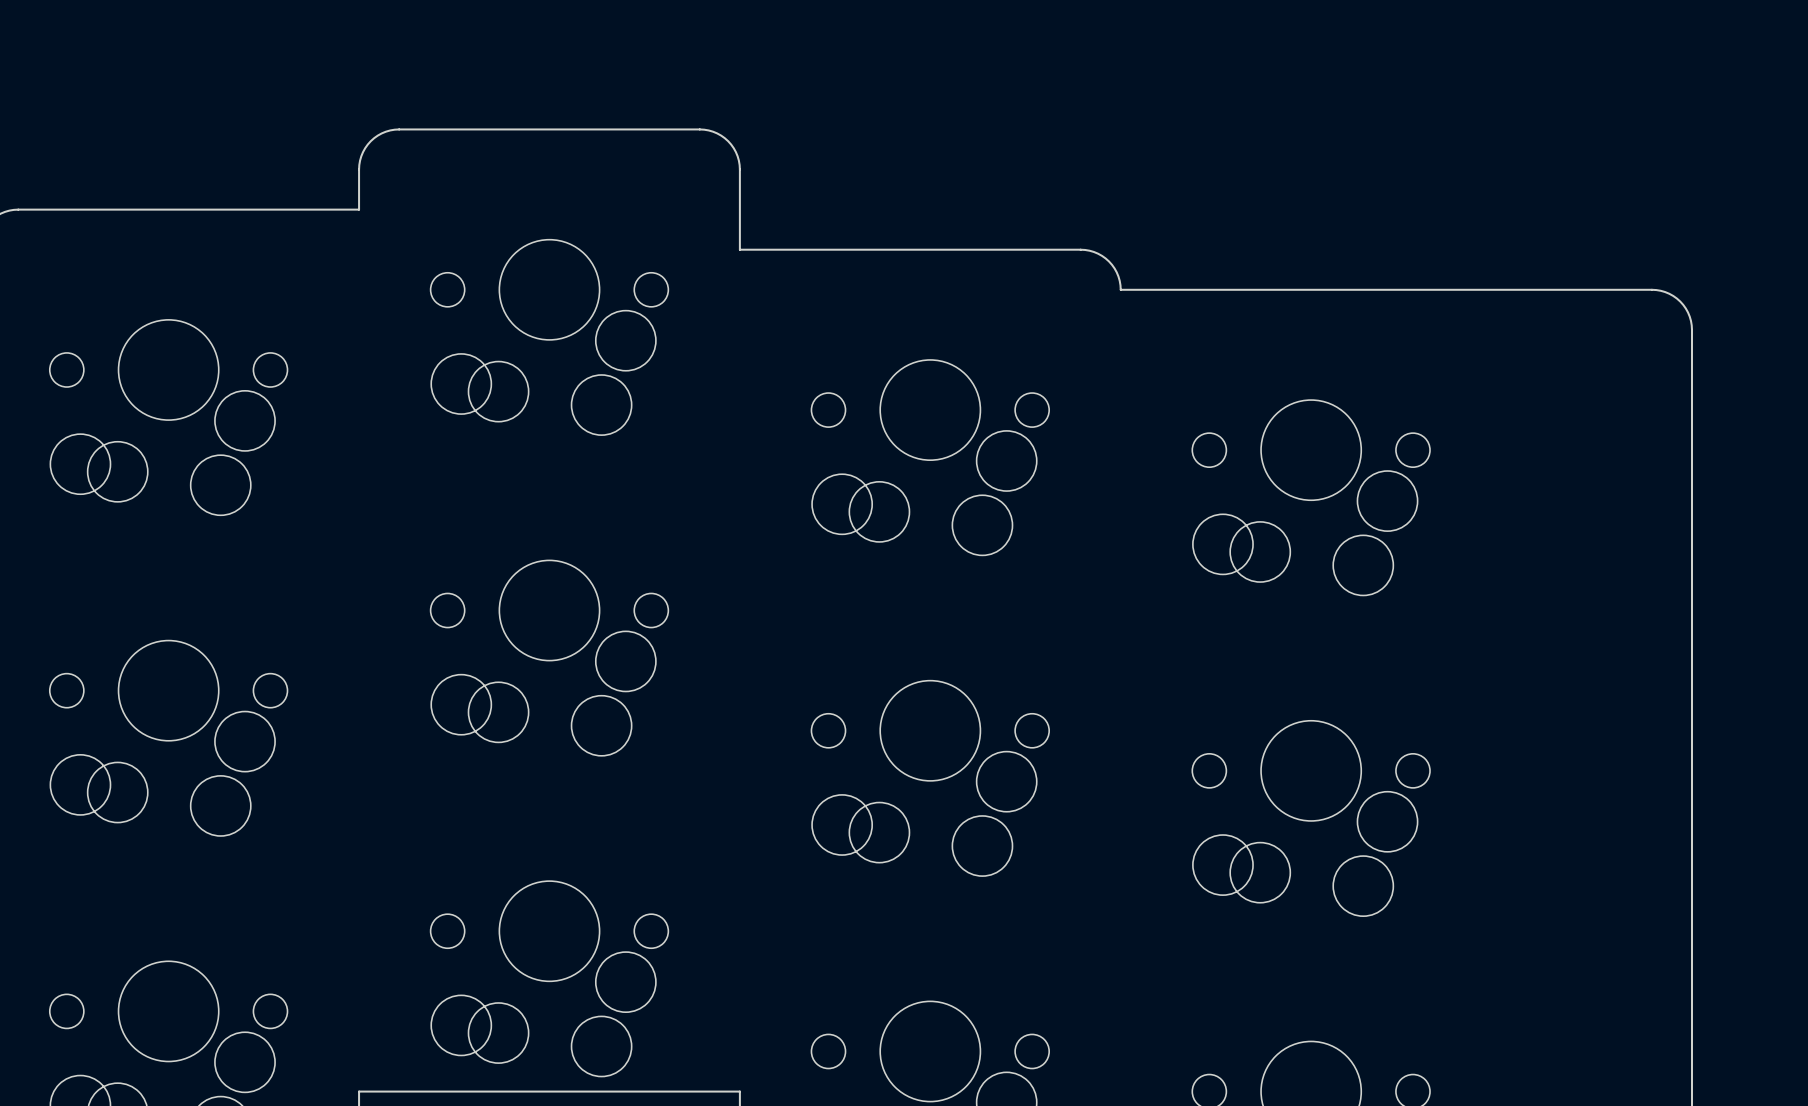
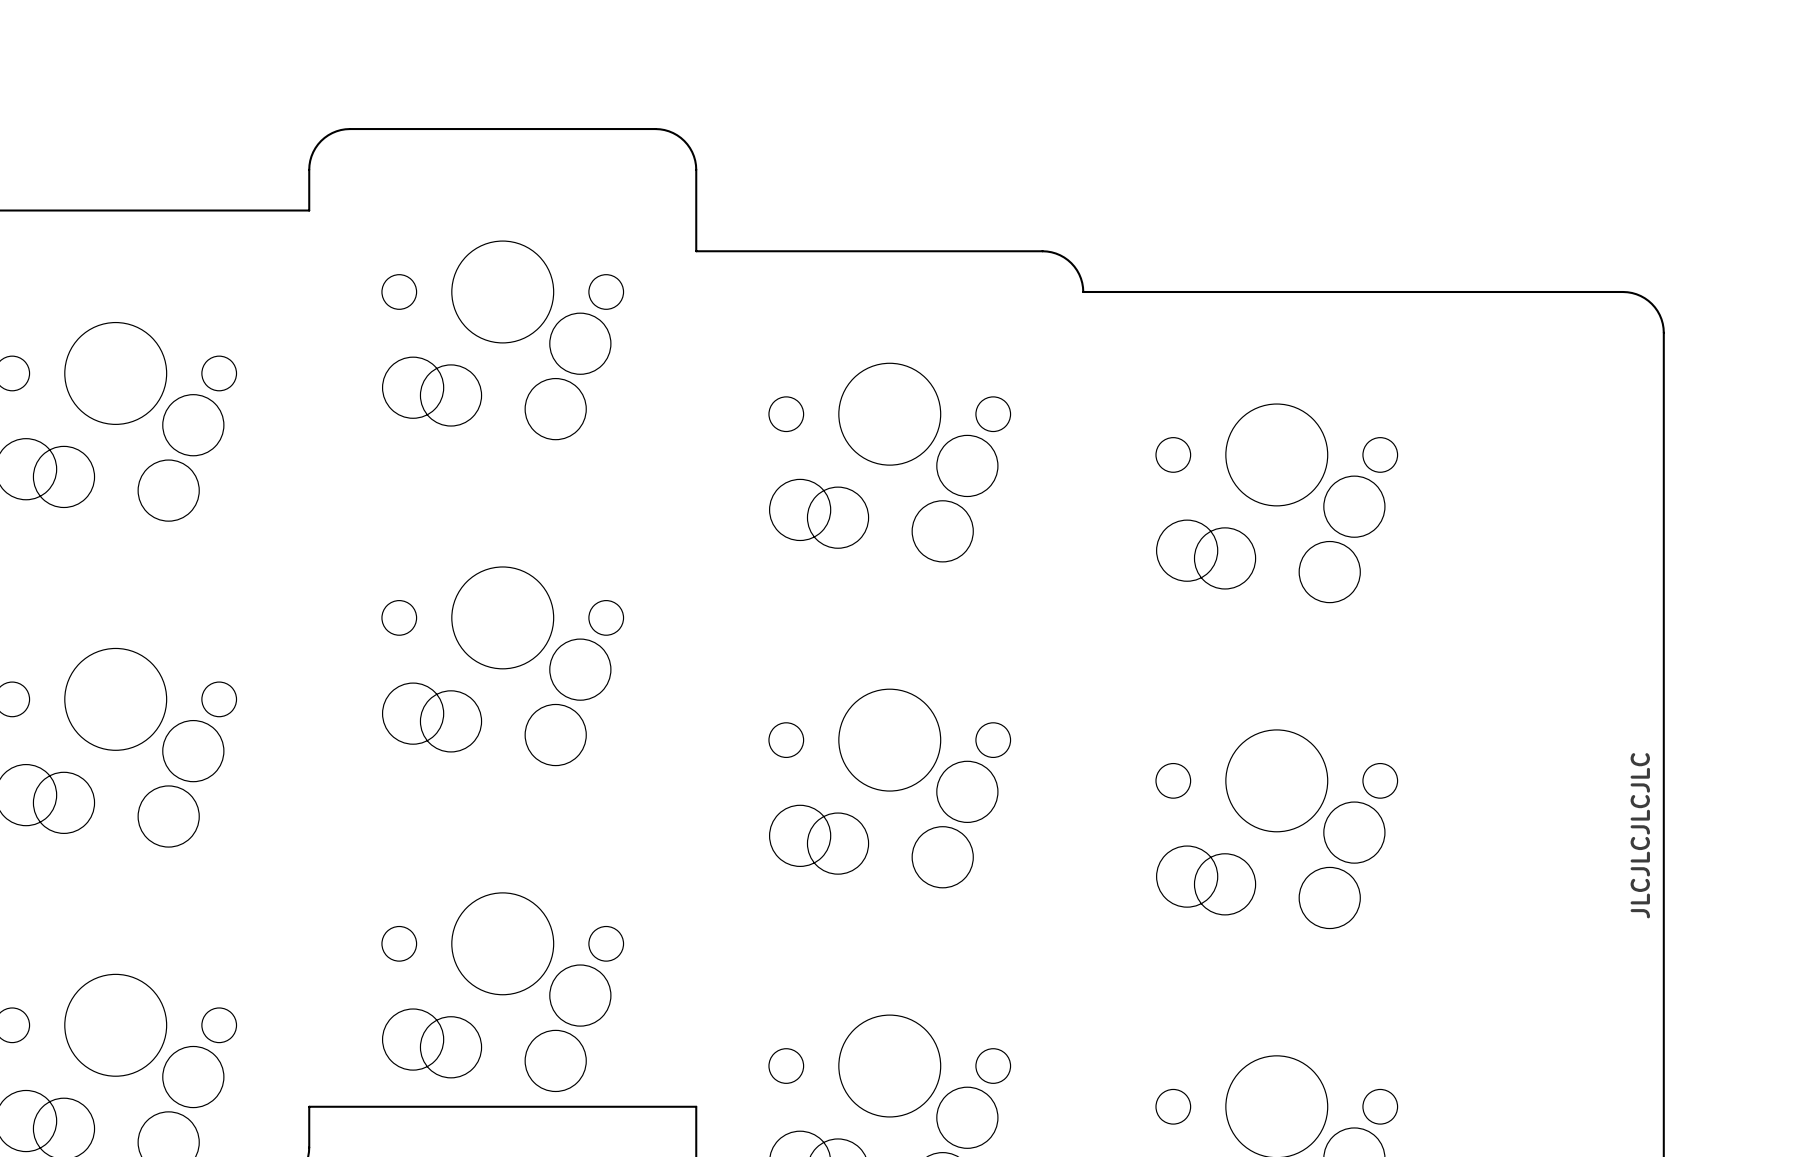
text: none -> JLCJLCJLCJLC (1640, 835)

